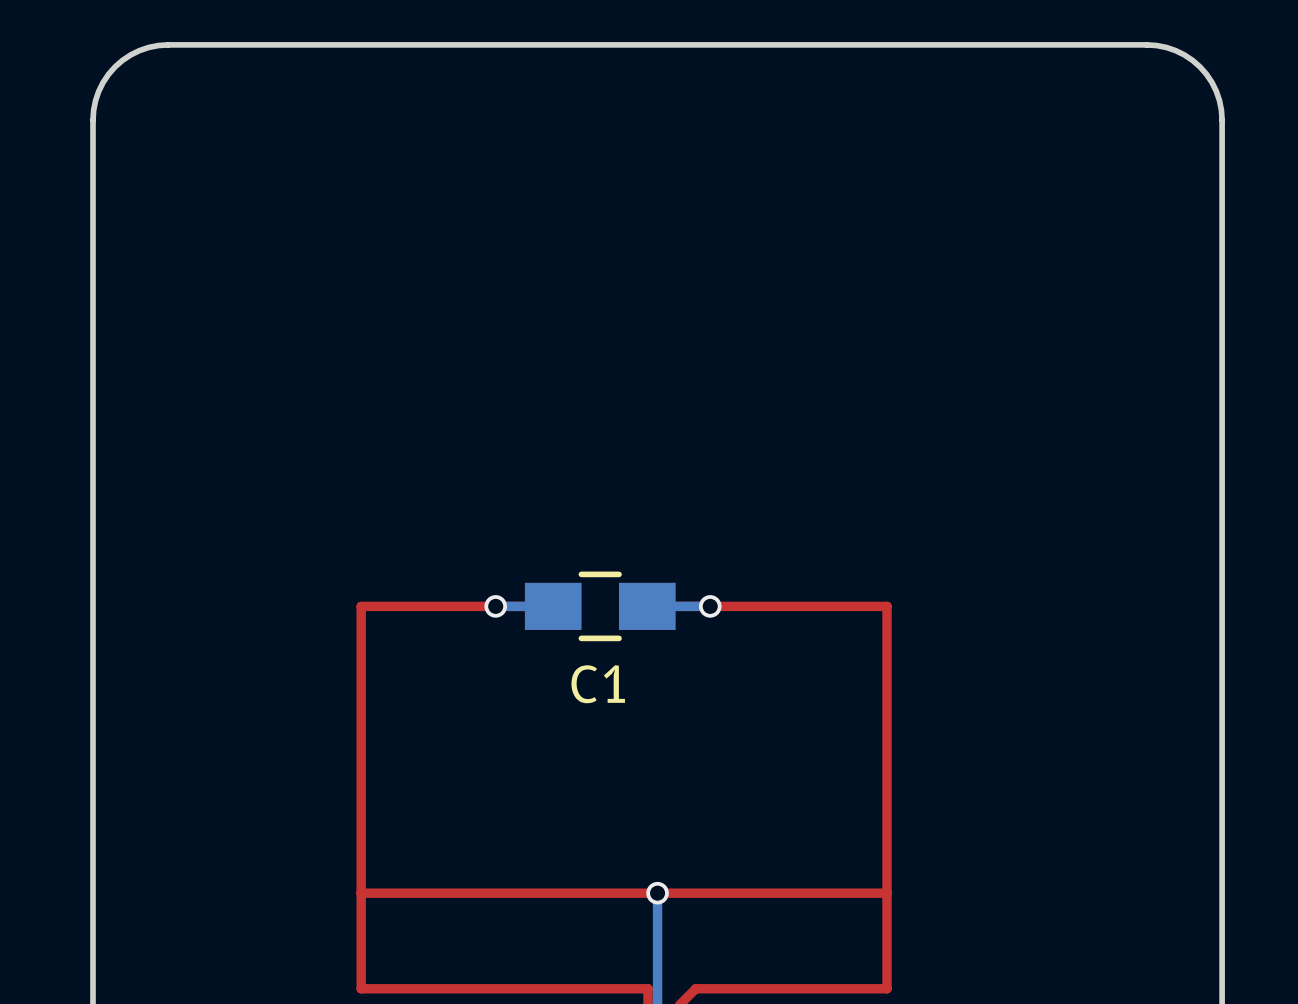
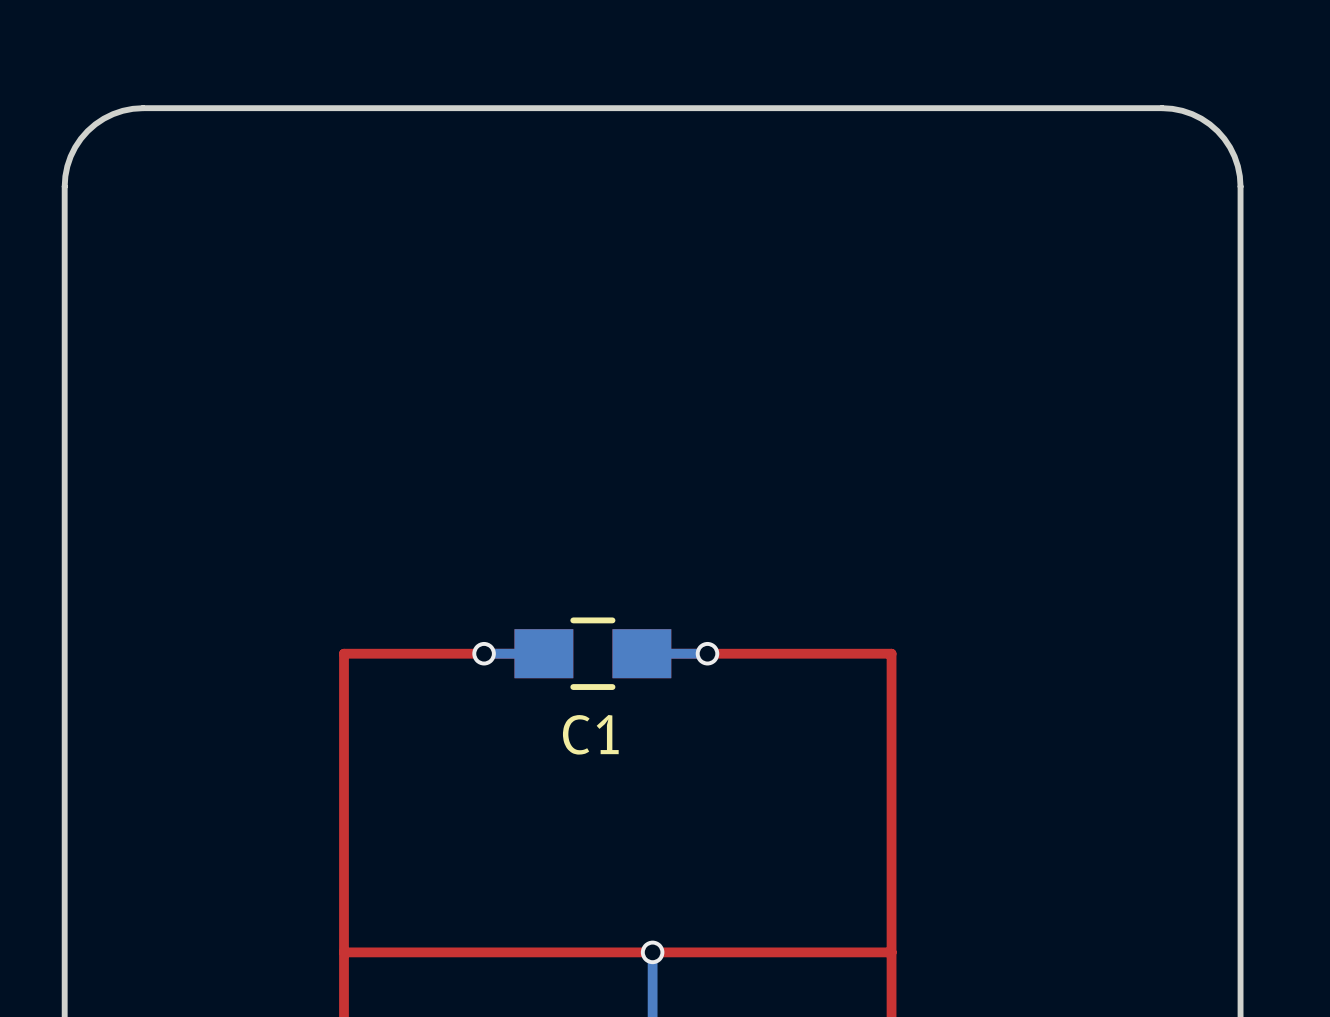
board edge: (1222, 157) (1221, 110) (1212, 82) (1200, 66) (1184, 54) (1166, 47) (1146, 44) (158, 45) (139, 50) (122, 60) (103, 82) (93, 110) (93, 157) -> (1240, 186) (1234, 156) (1217, 131) (1192, 114) (1162, 108) (132, 108) (103, 118) (87, 131) (70, 156) (64, 186)

